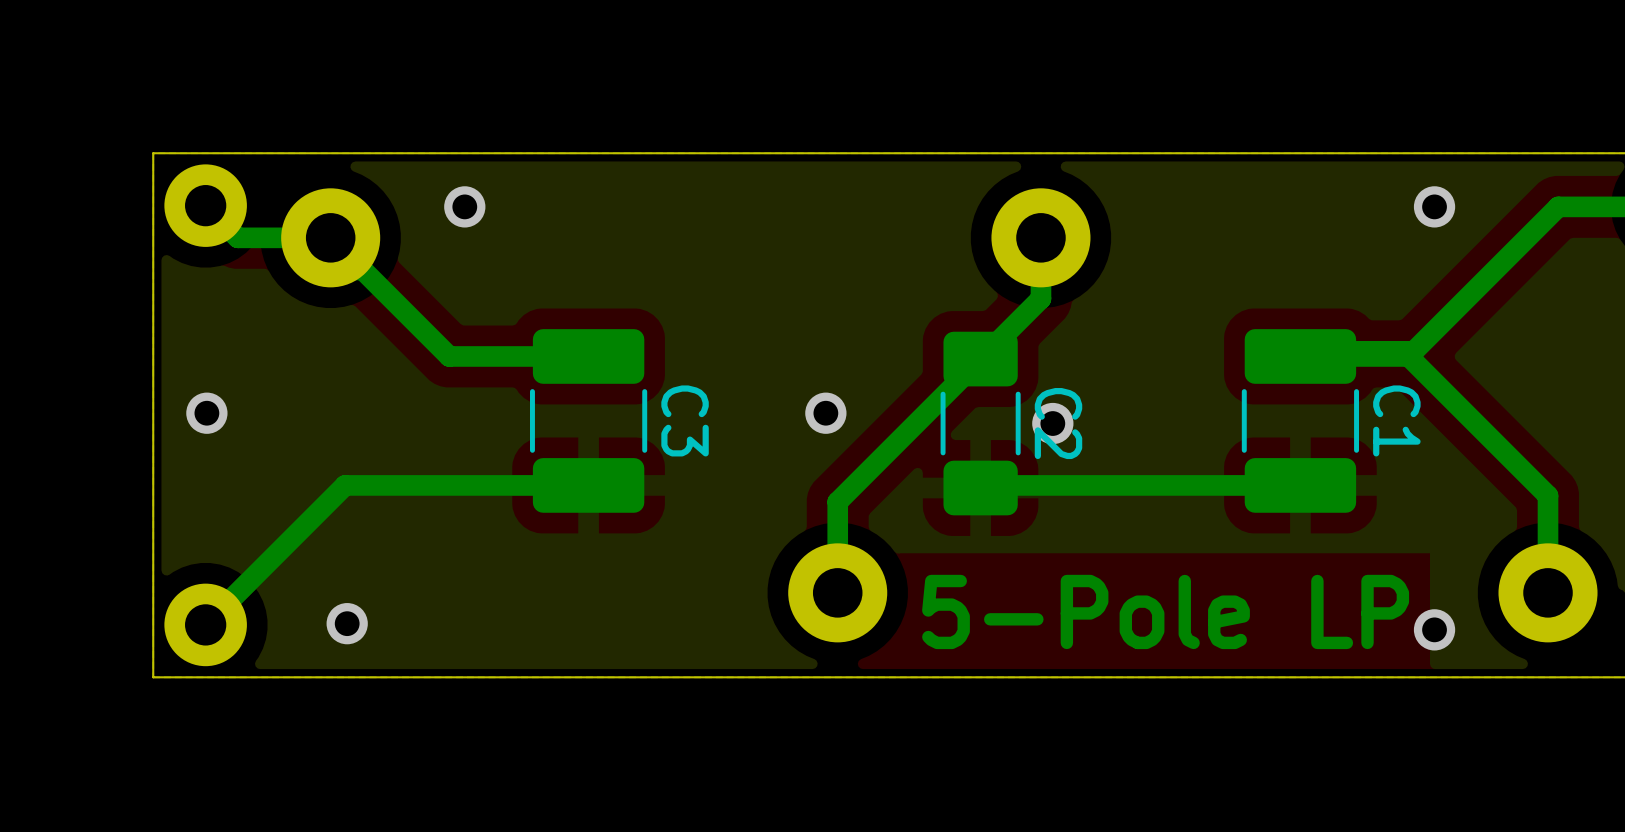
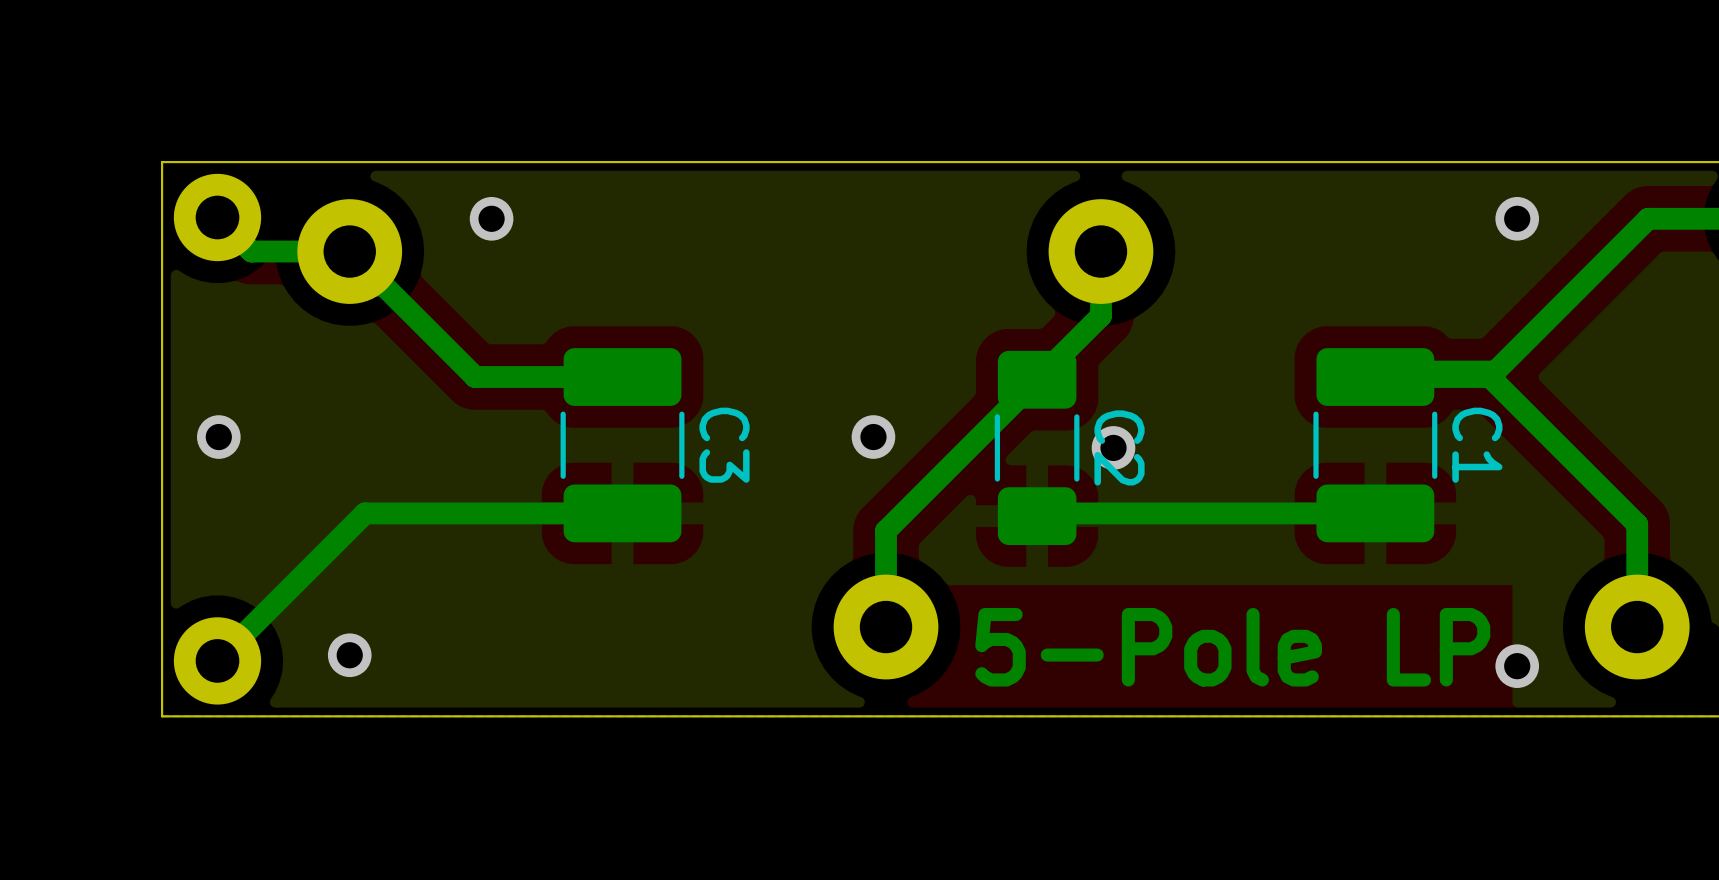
via position: (347, 623) -> (349, 655)

